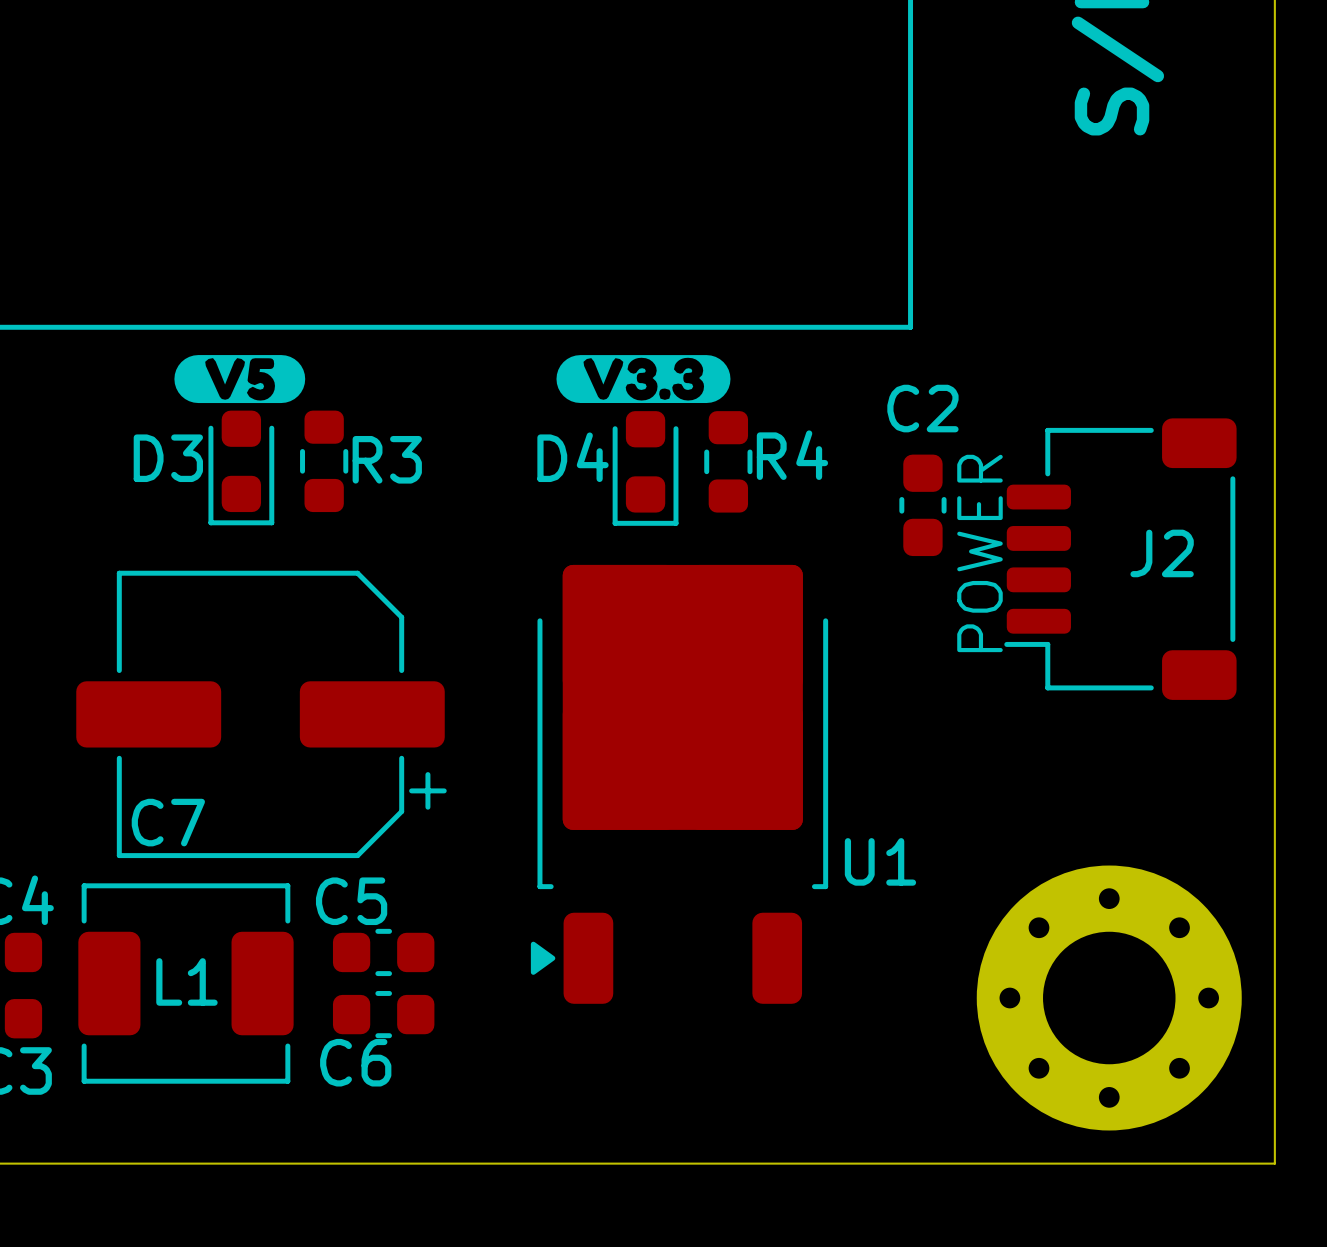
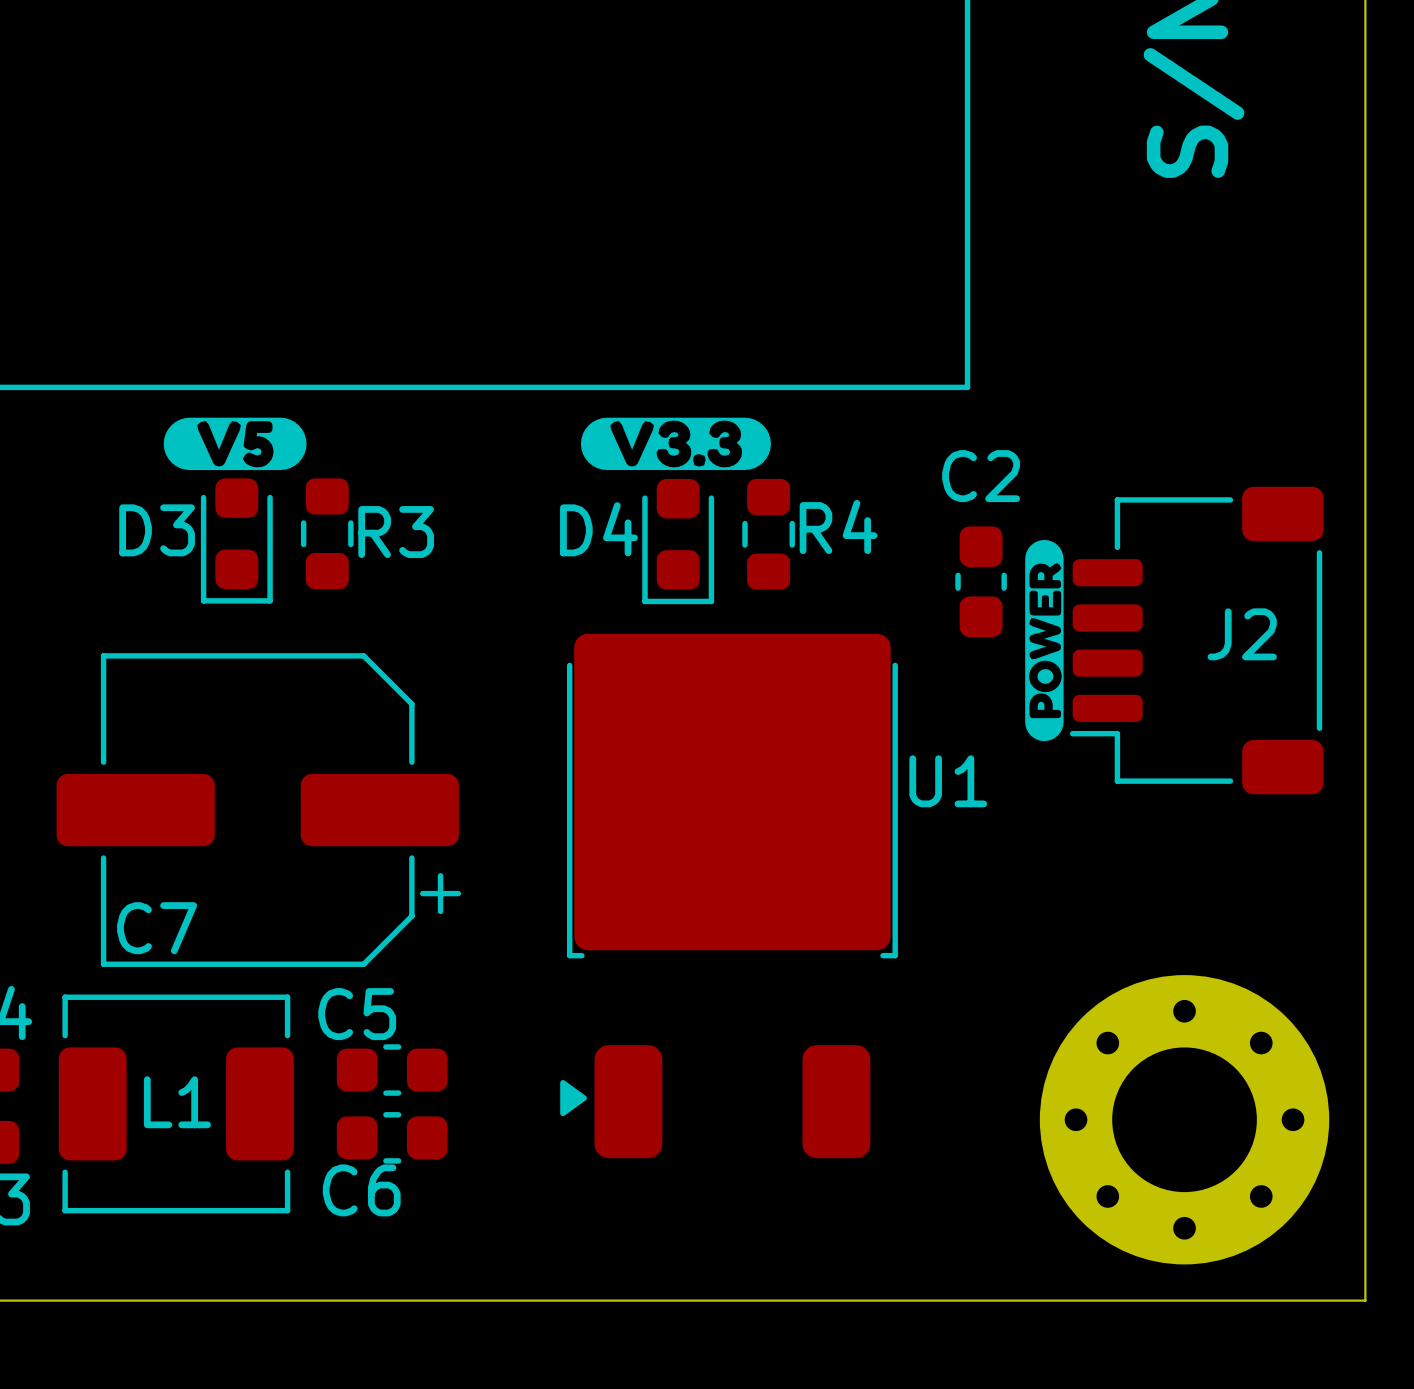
drawing: none -> [1025, 539, 1064, 742]
text: POWER (979, 553) -> none
U1 footprint: [530, 564, 829, 1004] -> [560, 633, 898, 1159]
U1 name position: U1 (880, 861) -> U1 (948, 781)

